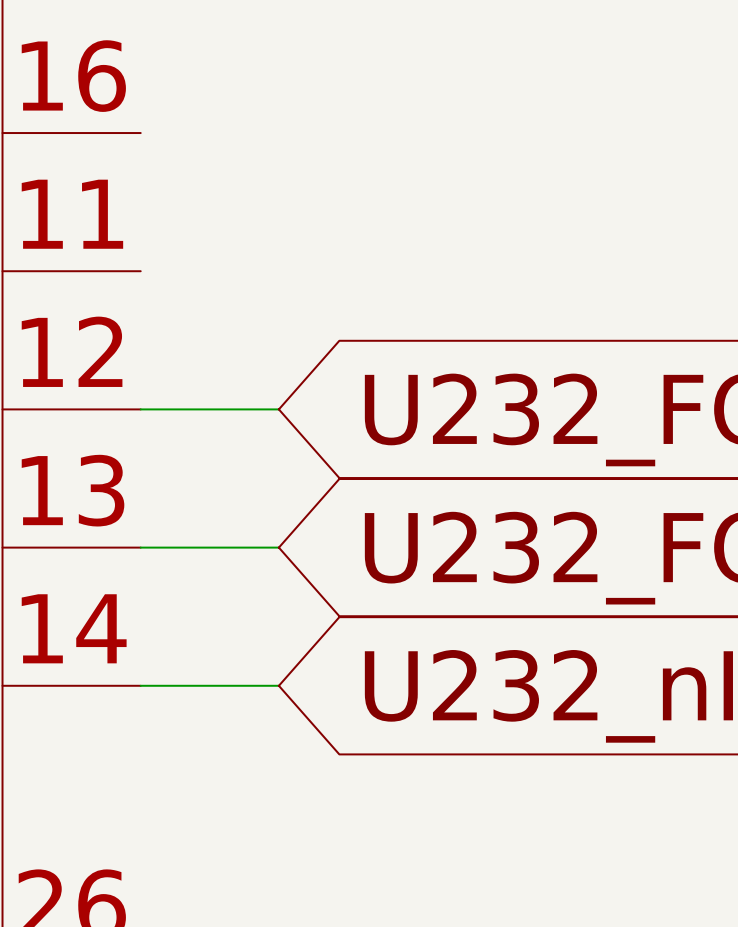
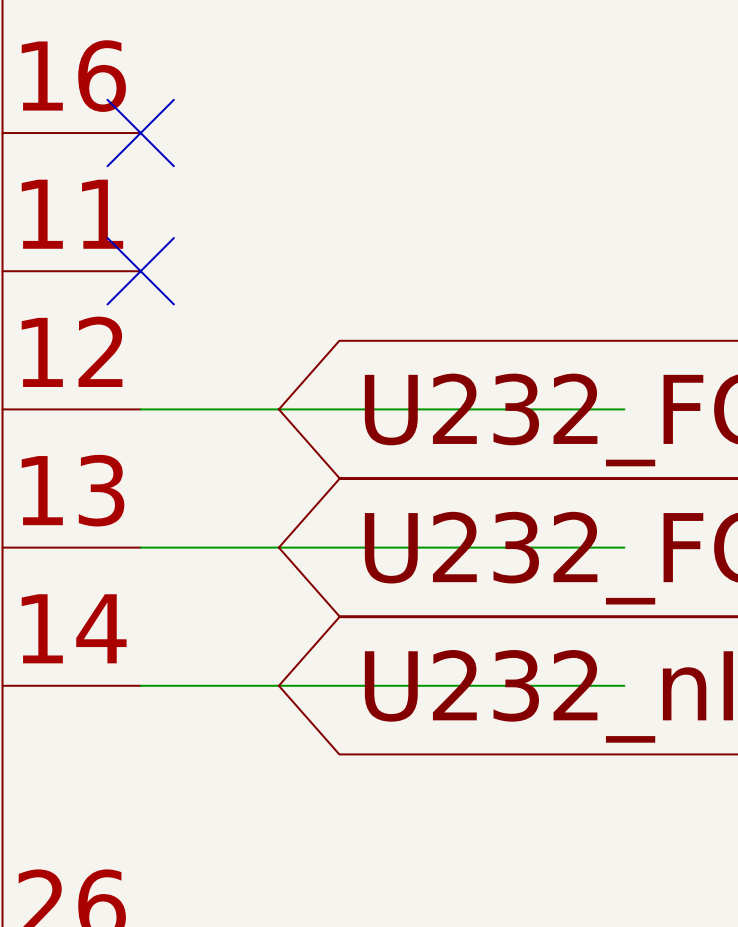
no-connect mark: none -> (140, 133)
no-connect mark: none -> (140, 271)
wire: none -> (278, 409) (624, 409)
wire: none -> (278, 547) (624, 547)
wire: none -> (278, 685) (624, 685)

